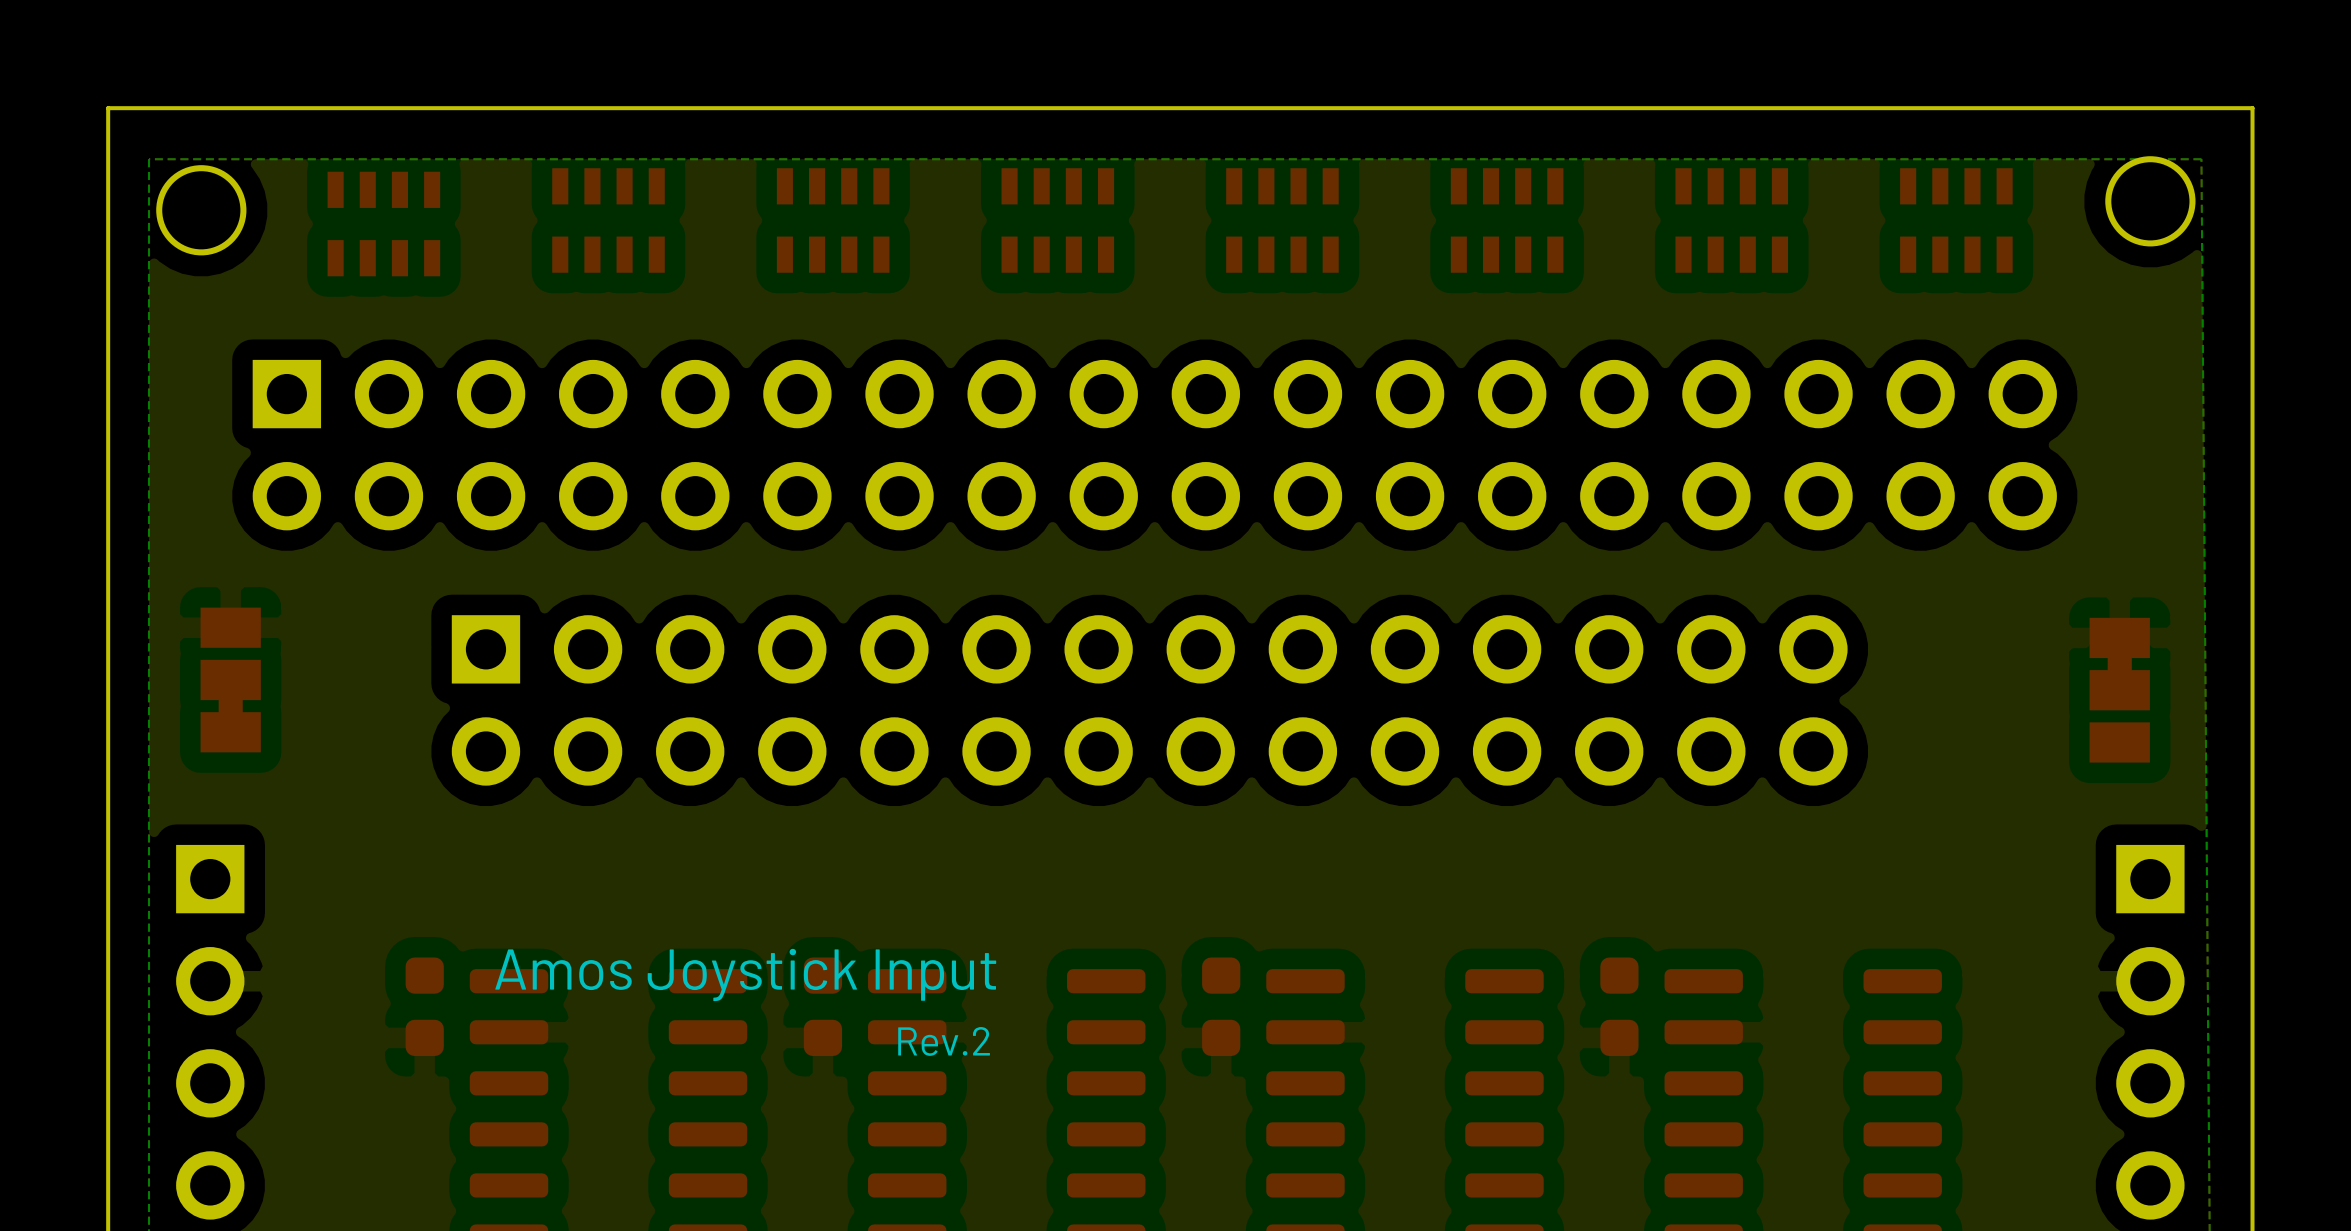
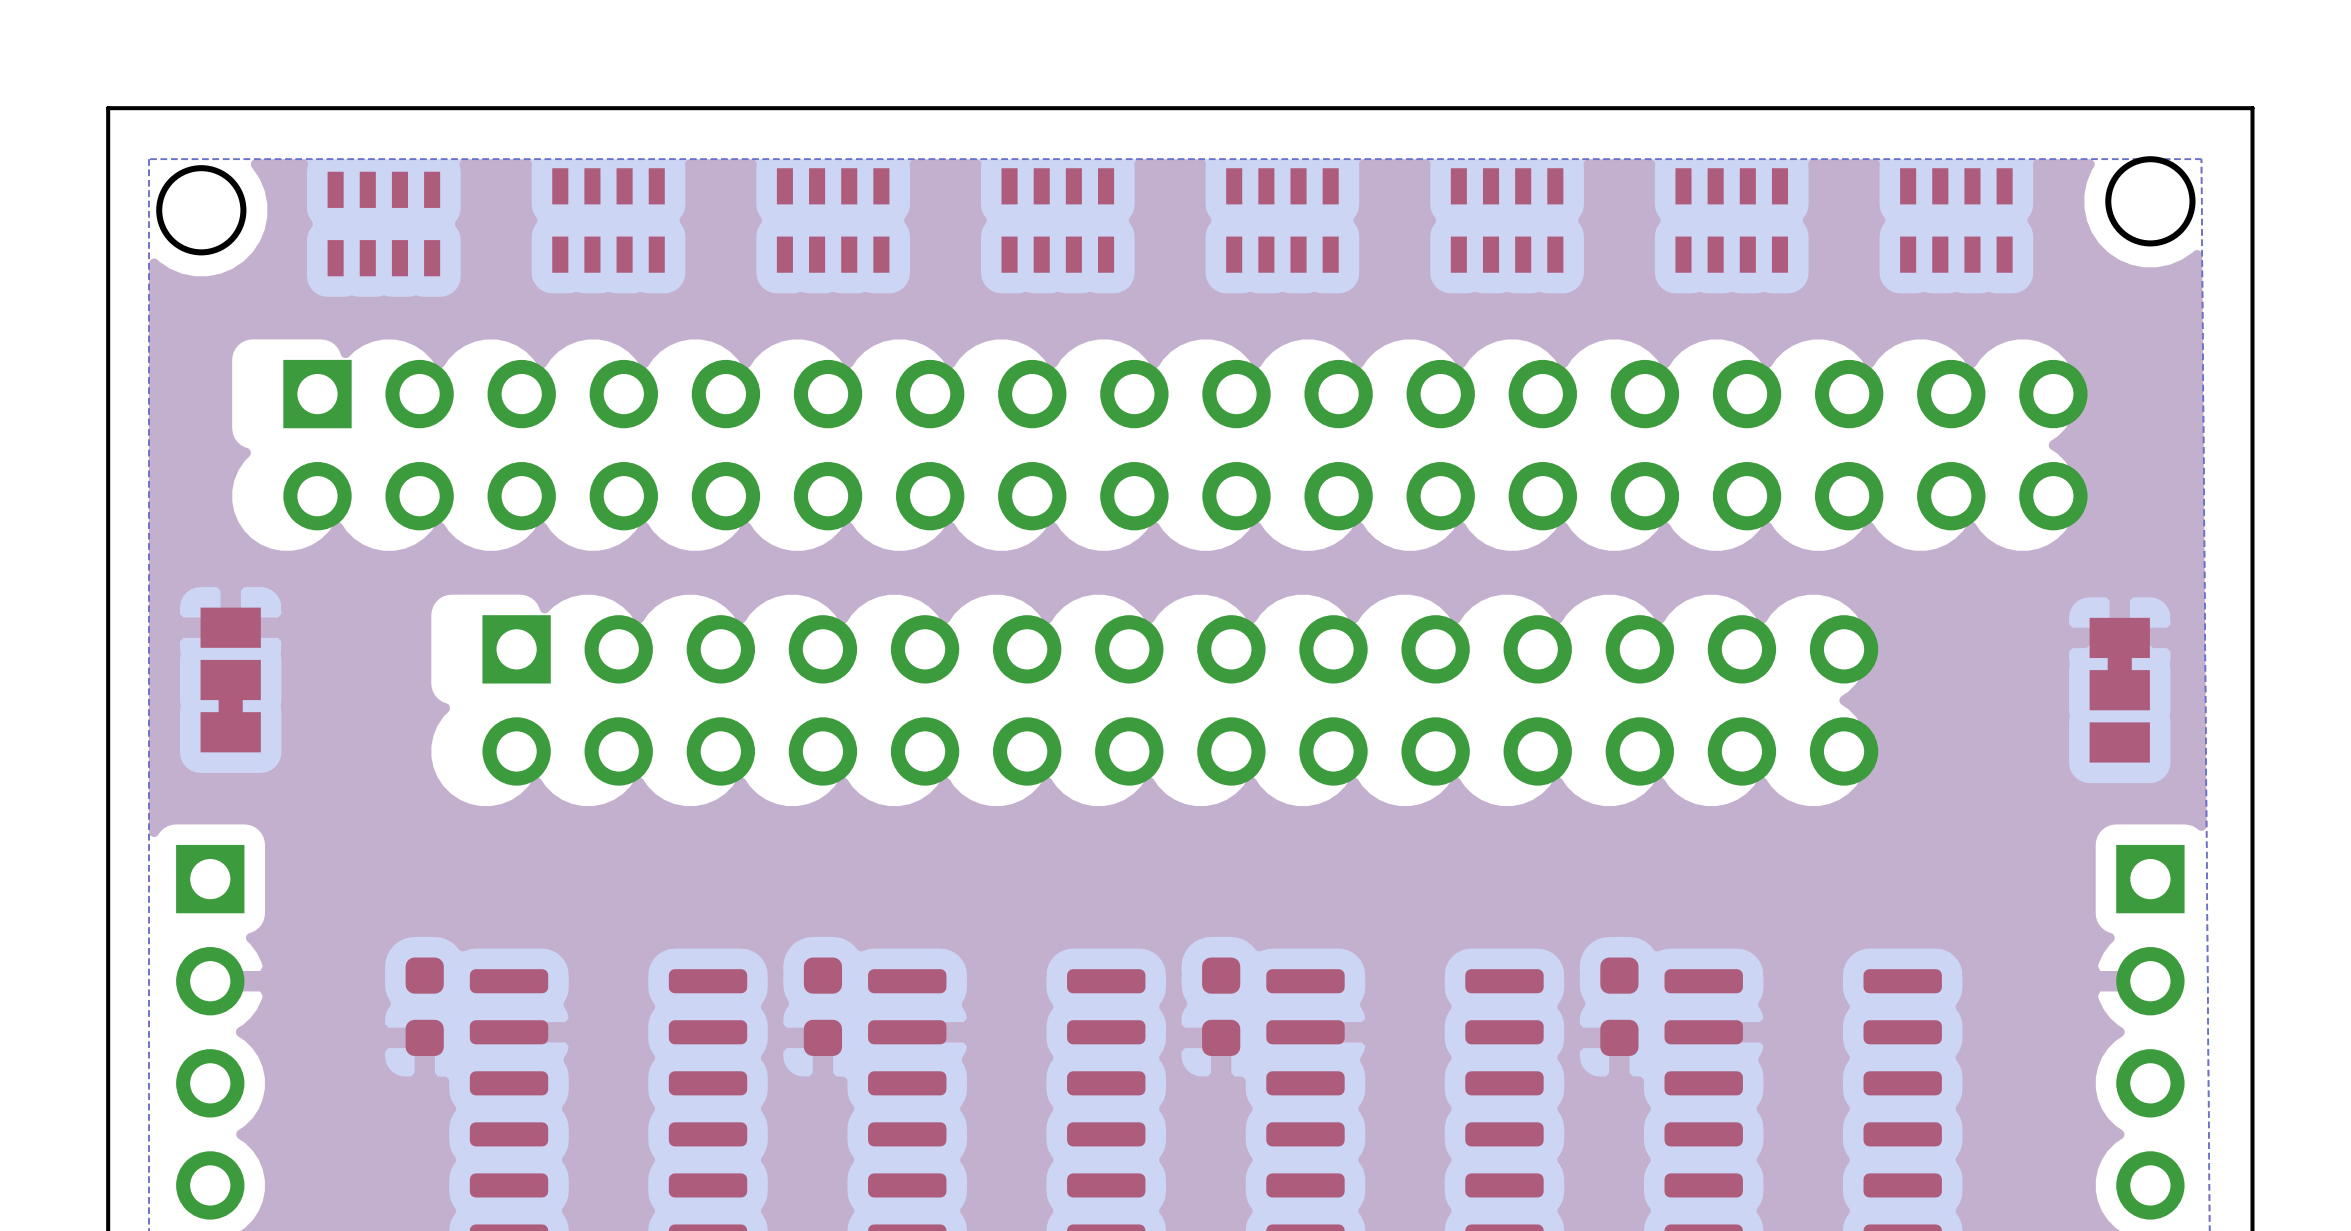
part position: (1154, 445) -> (1185, 445)
part position: (1149, 700) -> (1180, 700)
text: Amos Joystick Input (745, 974) -> none
text: Rev.2 (944, 1041) -> none

